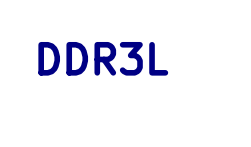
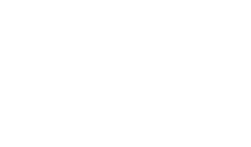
text: DDR3L (103, 58) -> none

